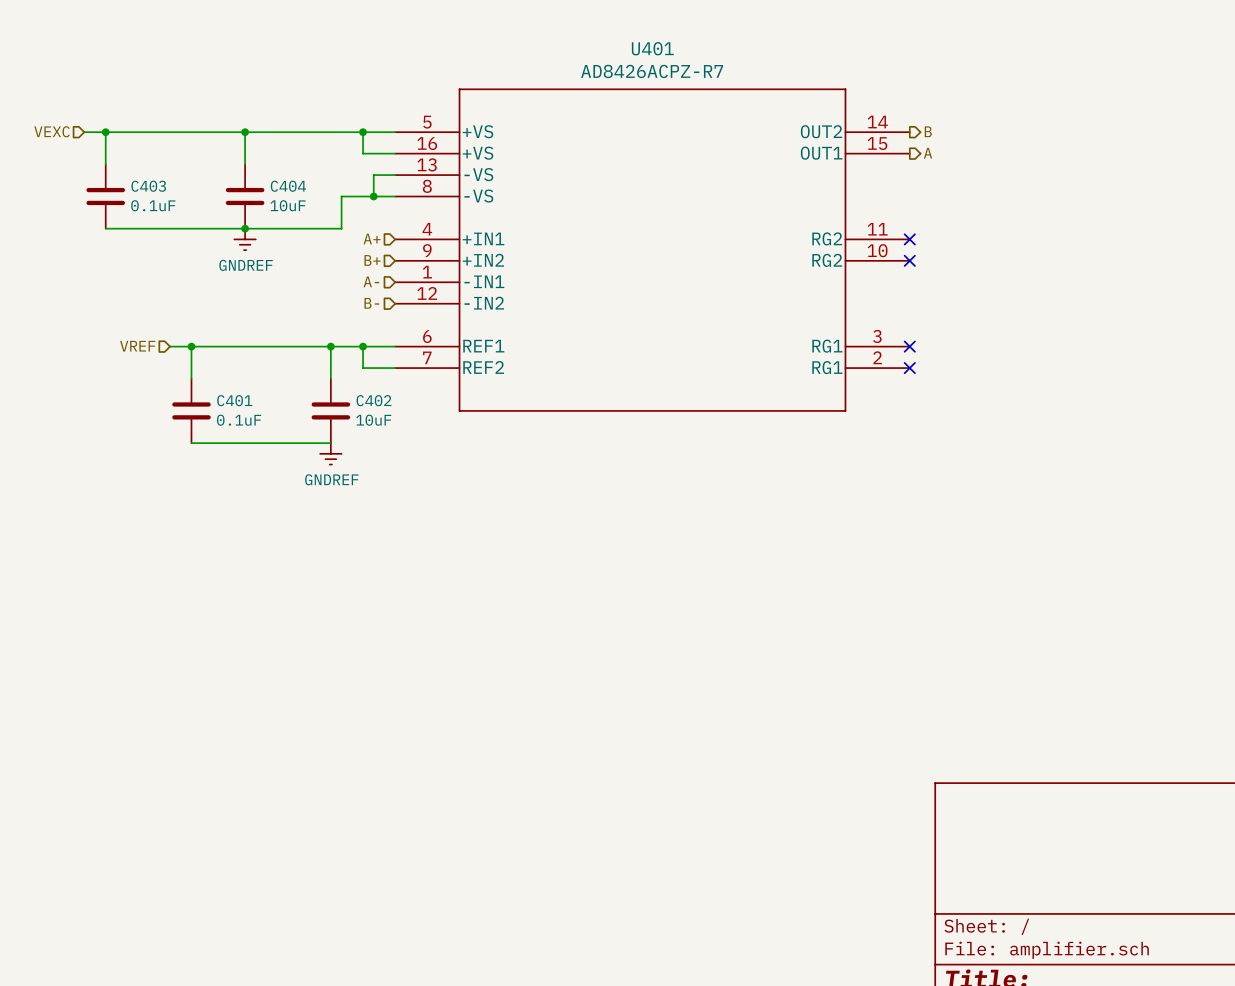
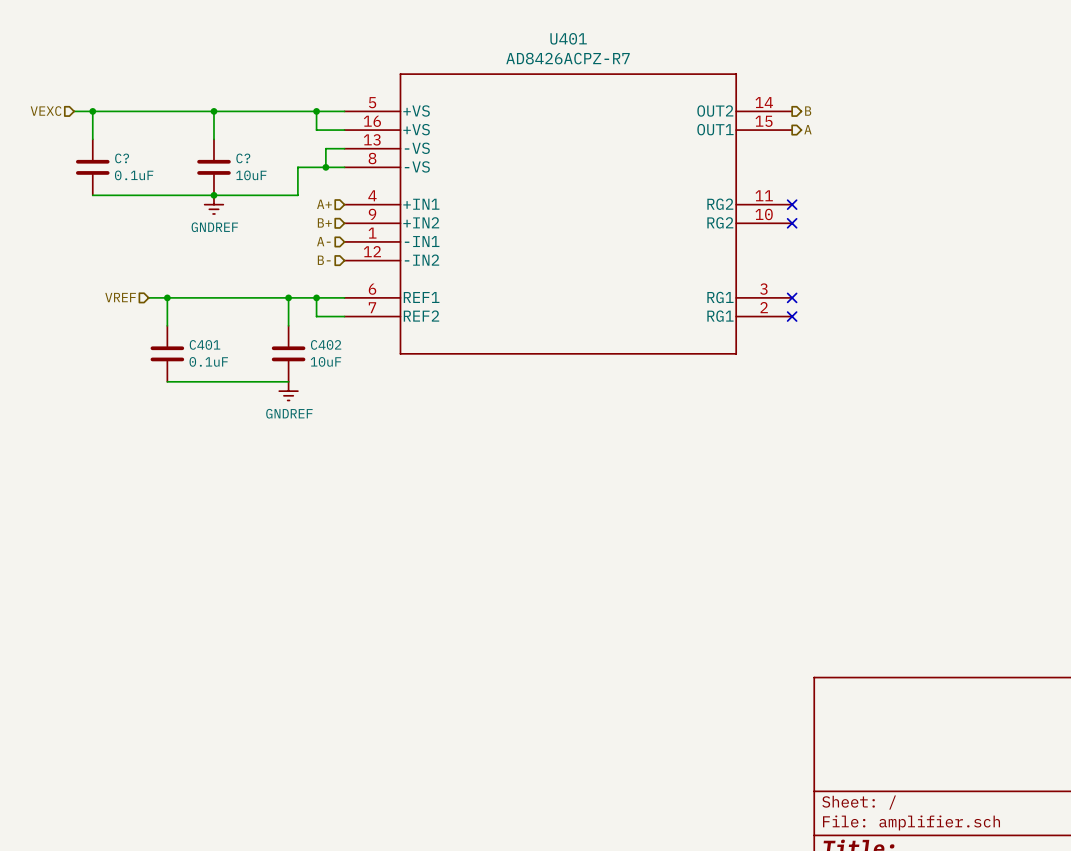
C403 name: C403 (148, 186) -> C? (122, 158)
C404 name: C404 (288, 186) -> C? (243, 158)

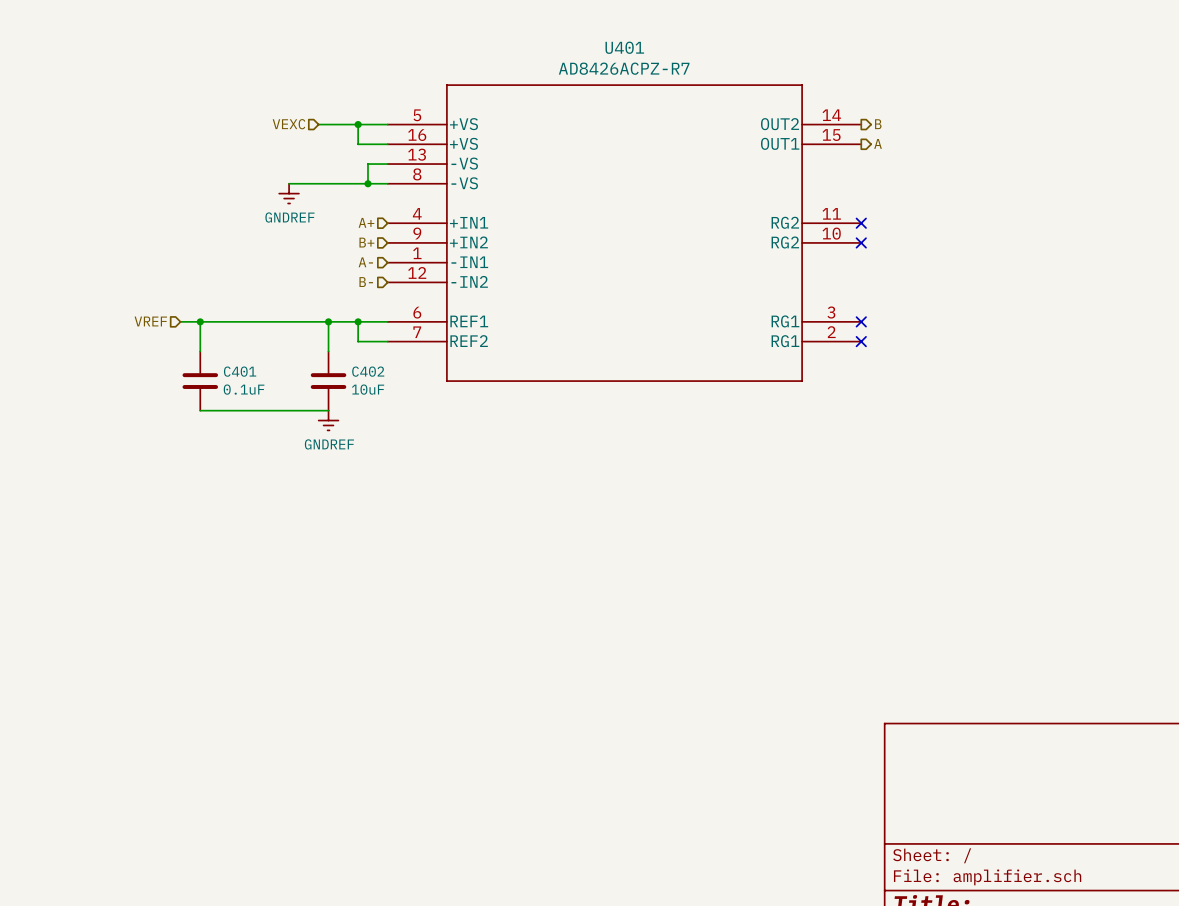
hierarchical label: VEXC (46, 111) -> none
wire: (74, 111) (279, 111) -> none
wire: (92, 111) (92, 139) -> none
junction: (92, 111) -> none
wire: (213, 111) (213, 139) -> none
junction: (213, 111) -> none
hierarchical label: none -> VEXC (288, 124)
C?: 0.1uF (92, 167) -> none
C?: 10uF (213, 167) -> none
wire: (297, 167) (297, 195) (92, 195) -> (338, 183) (289, 183)
junction: (213, 195) -> none
power symbol position: GNDREF (213, 204) -> GNDREF (289, 193)

